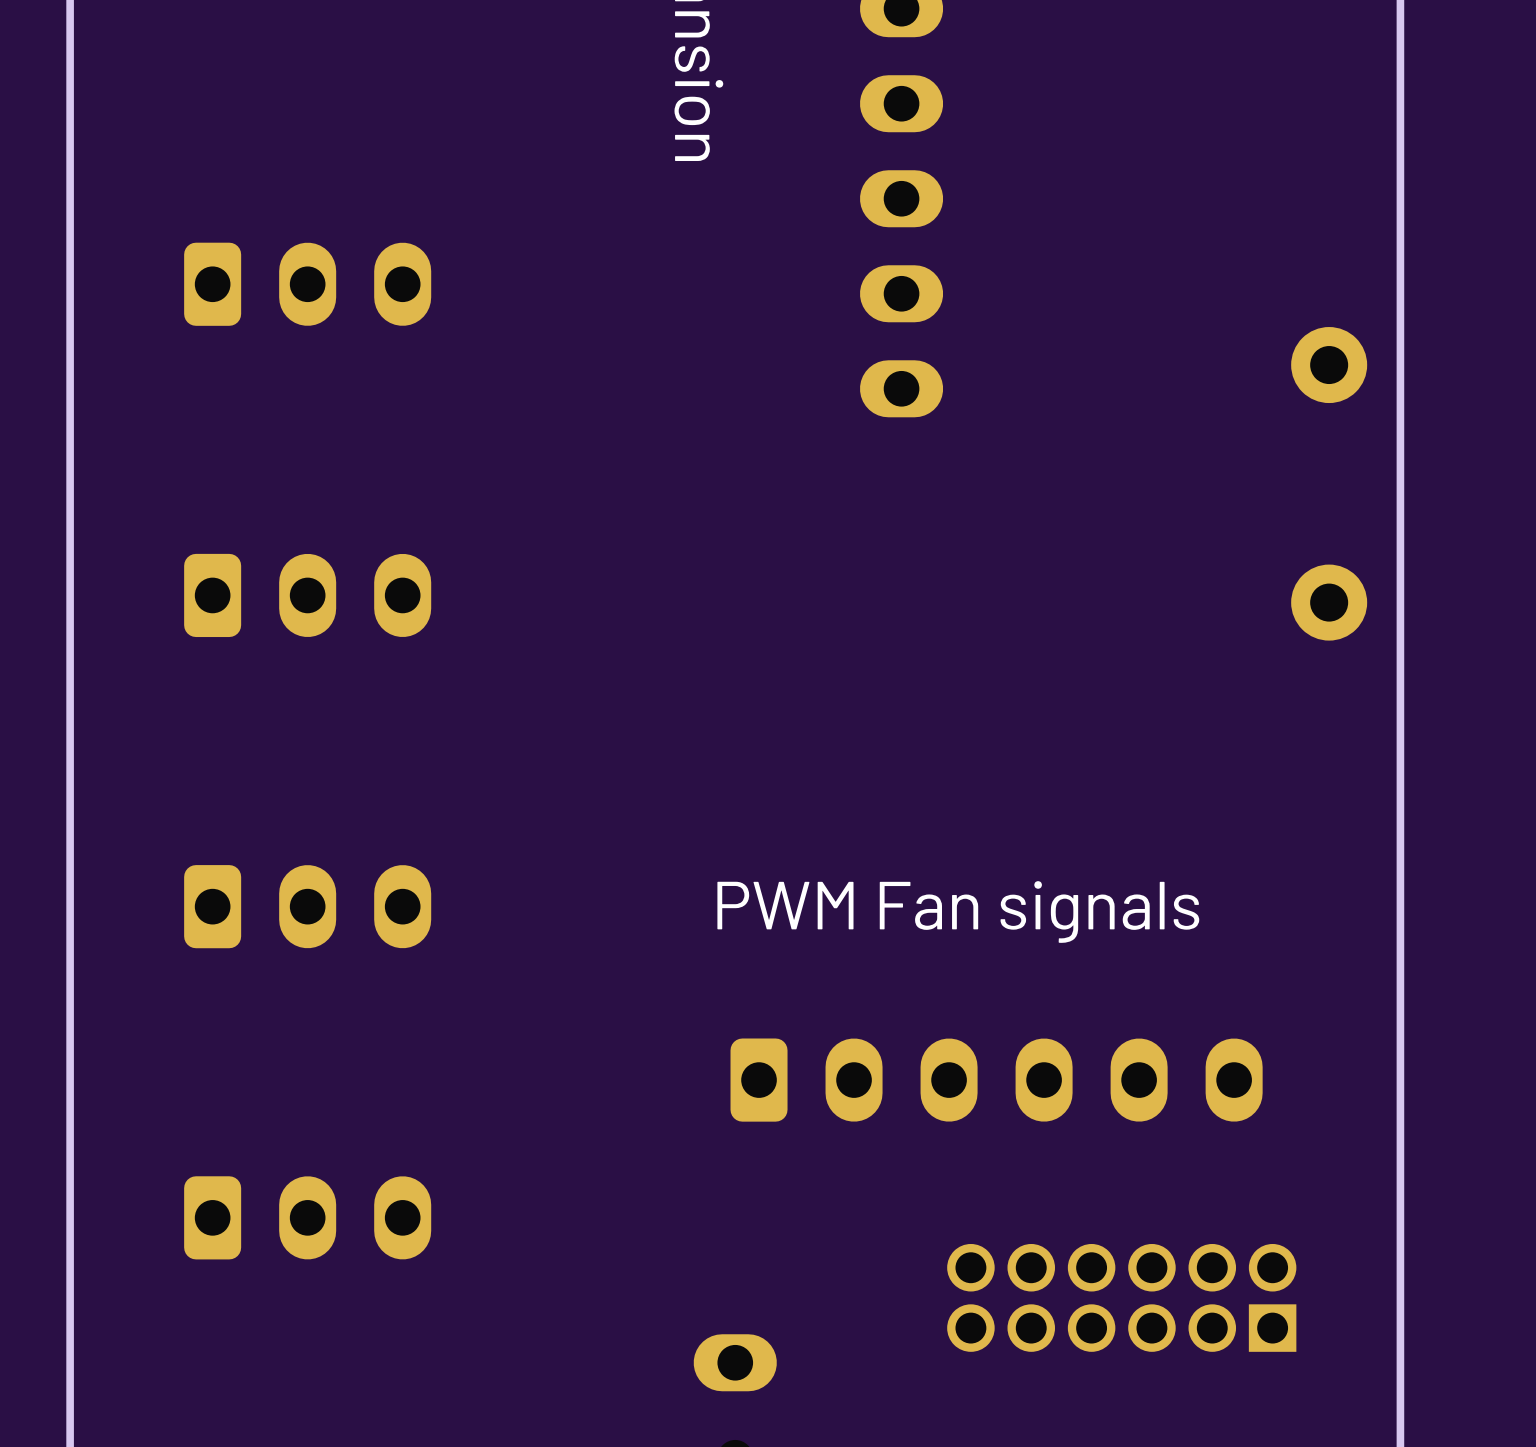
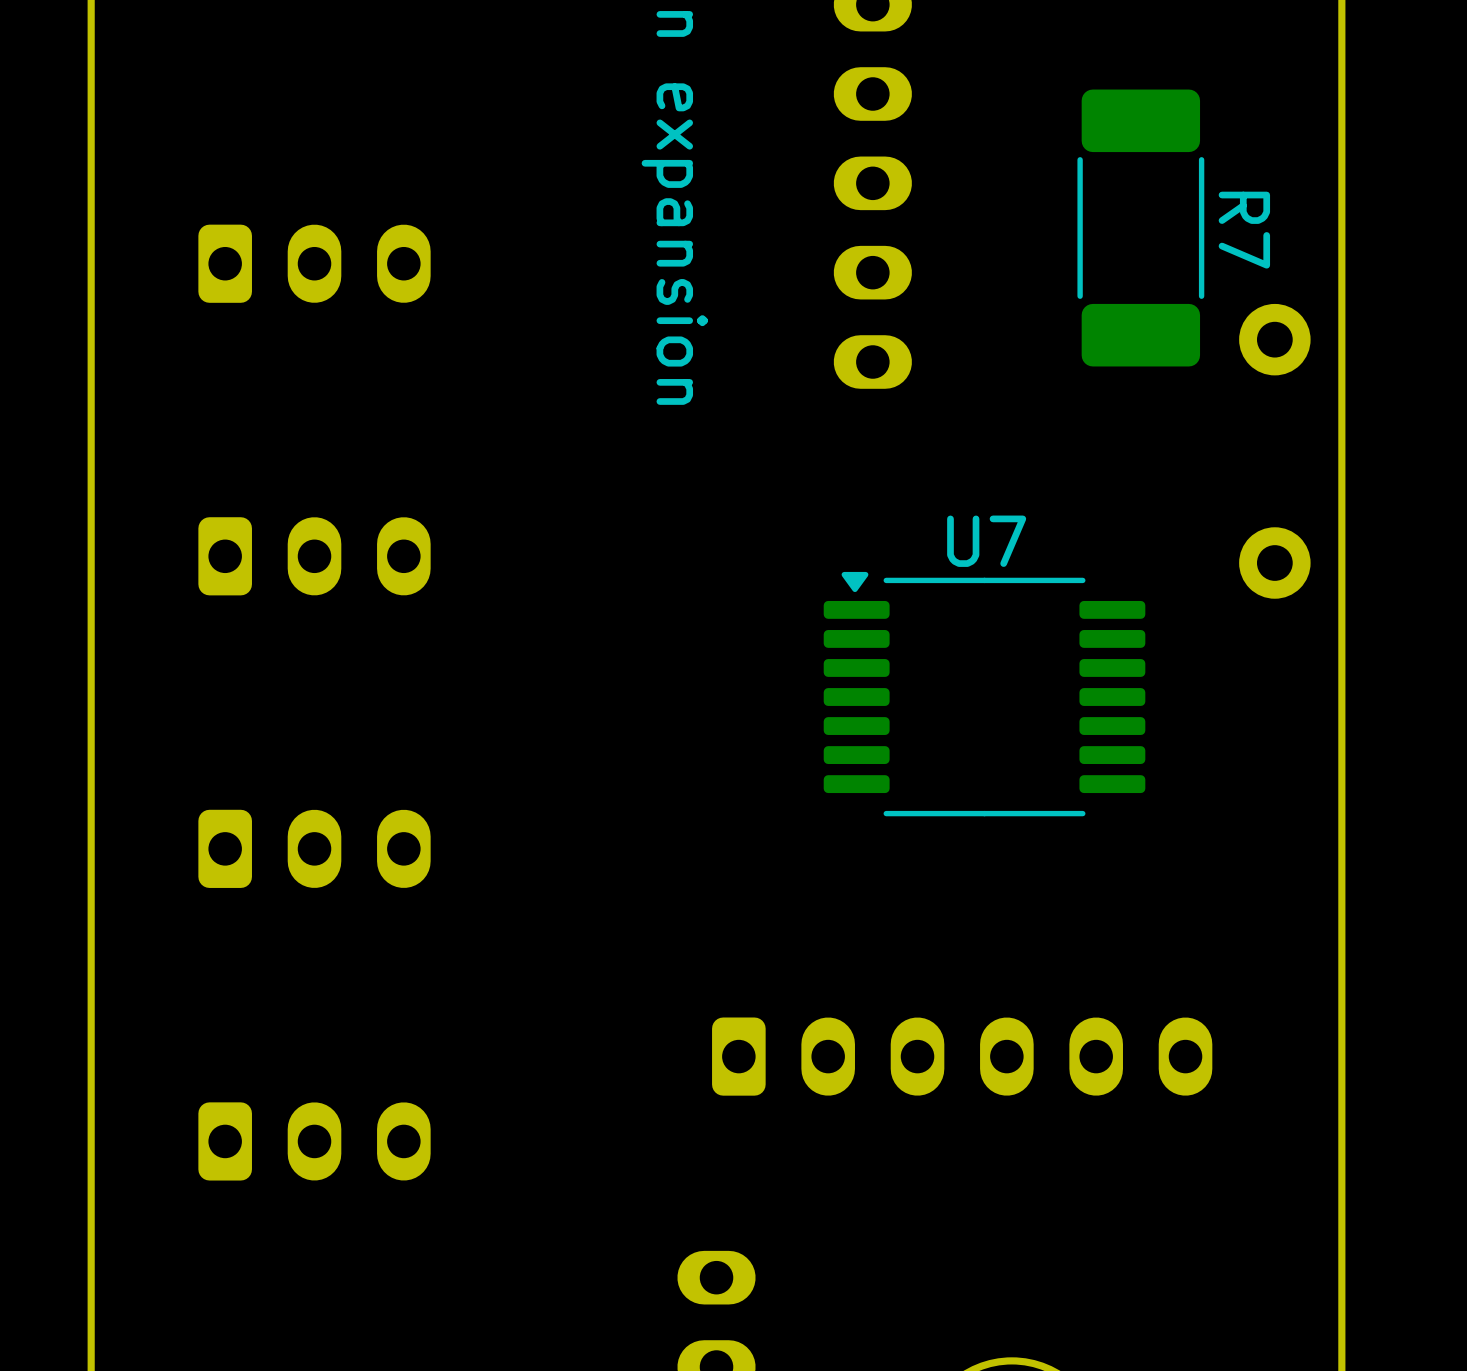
R7: none -> (1140, 228)
U7: none -> (984, 694)
text: PWM Fan signals (958, 912) -> none
part position: (996, 1080) -> (962, 1056)
part: (1121, 1297) -> none

